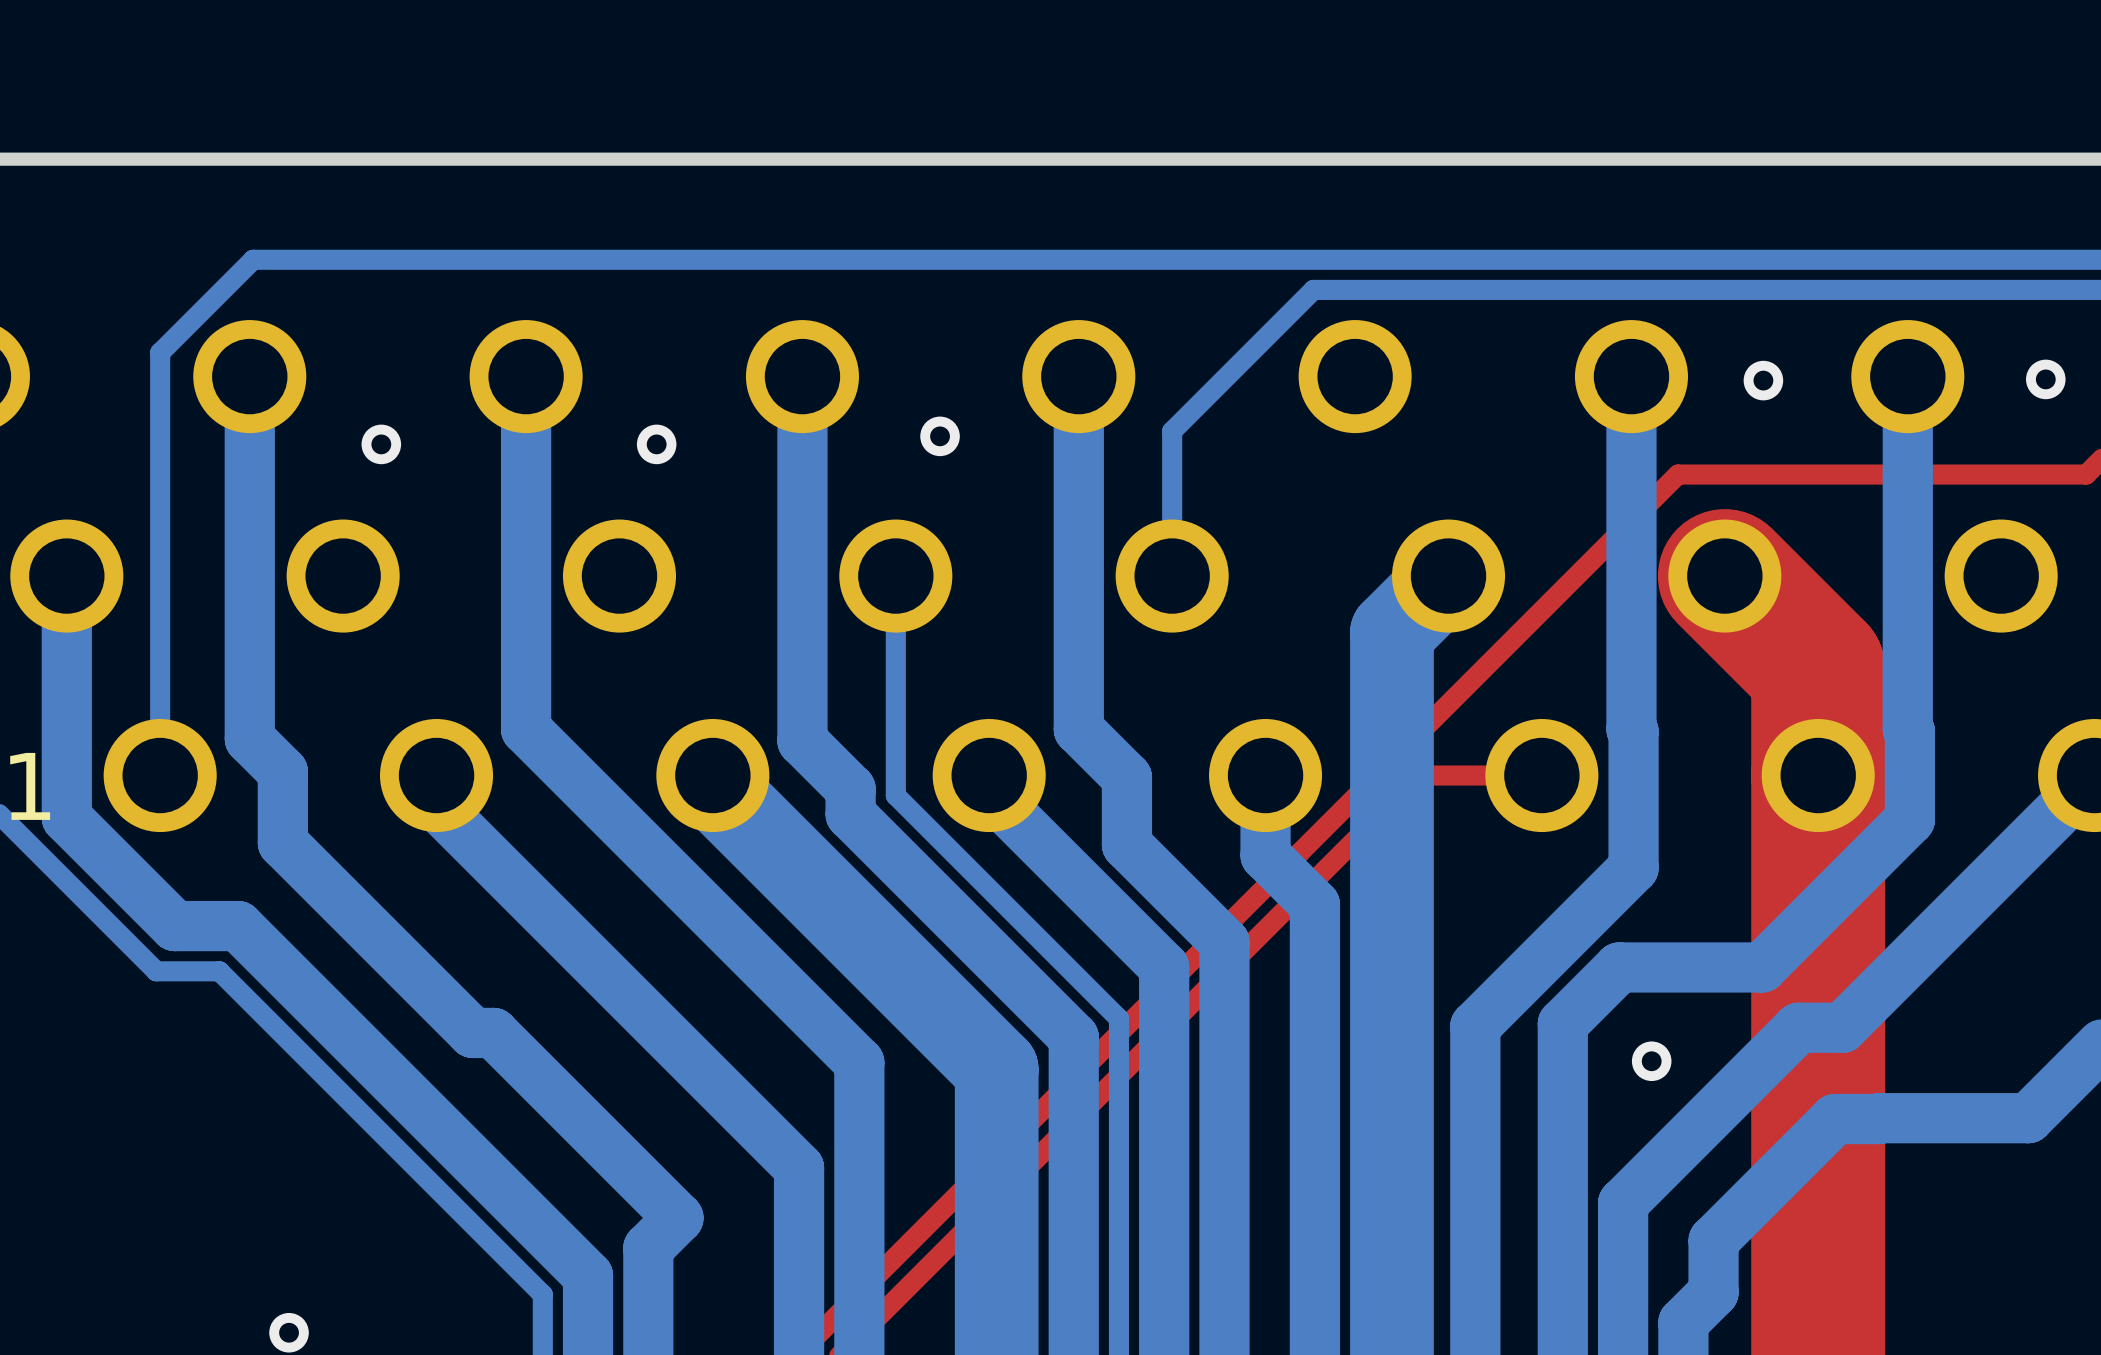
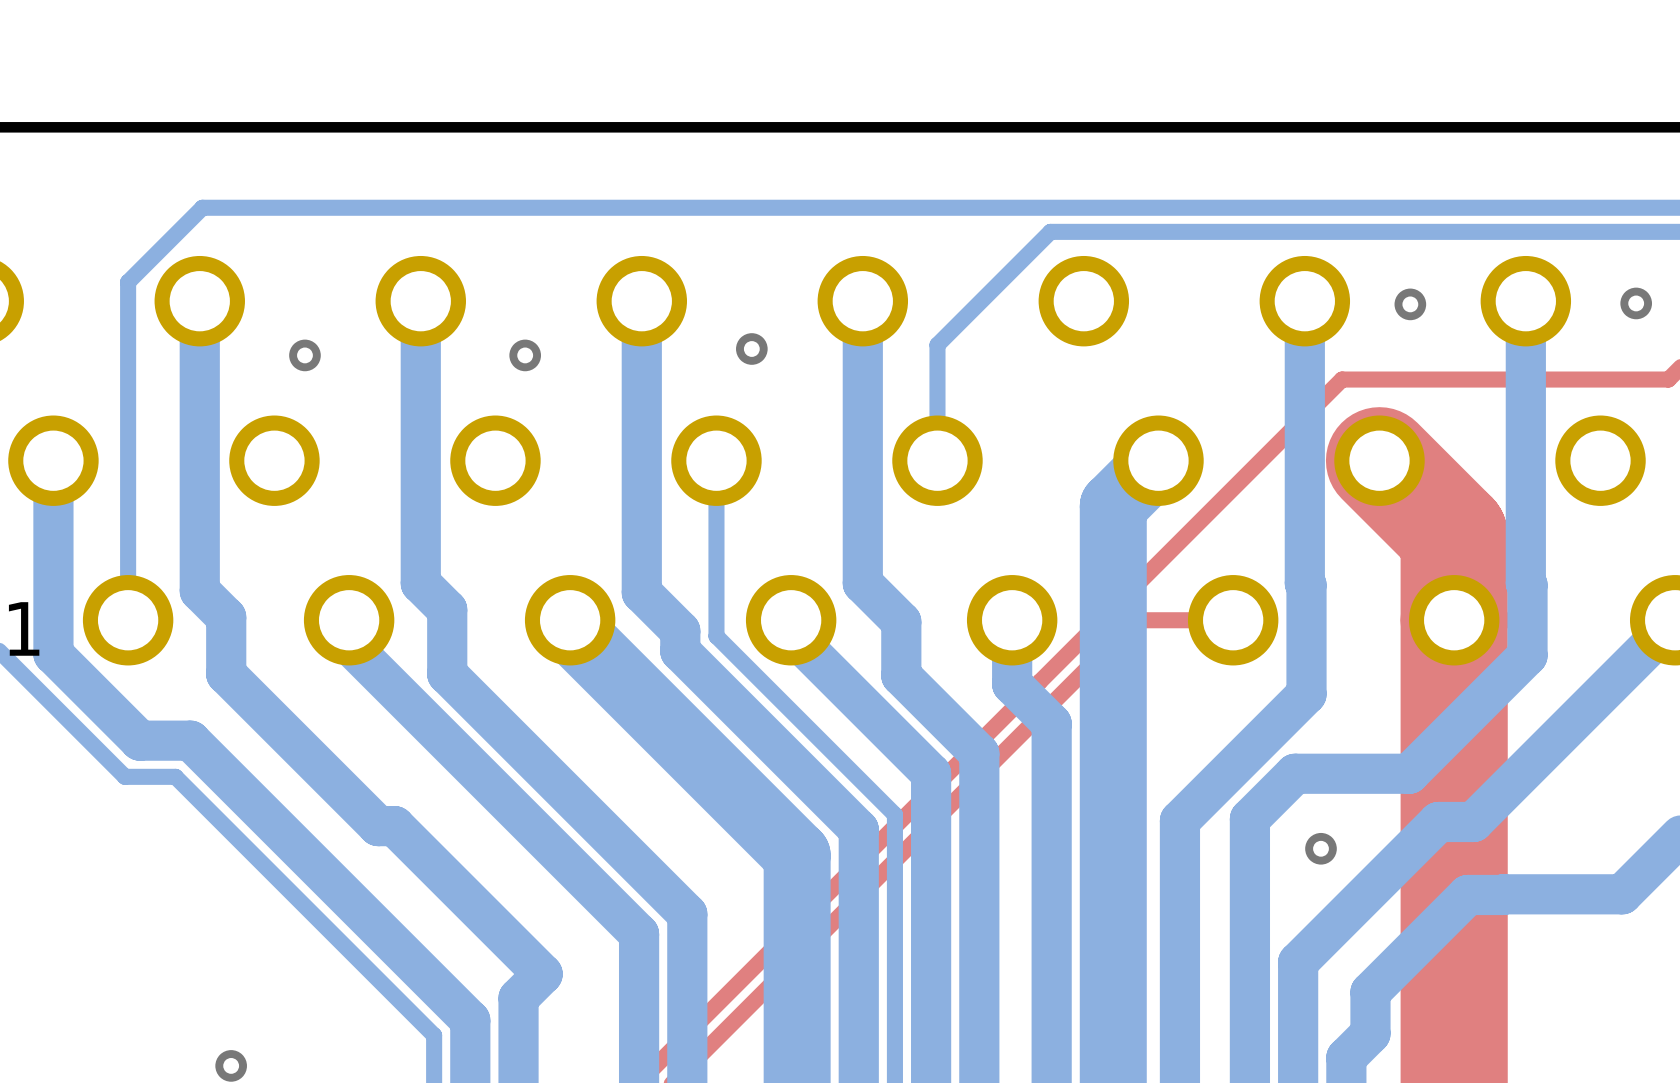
bottom track: (559, 762) (859, 1062) (859, 1143) -> (447, 609) (447, 674) (687, 914)

